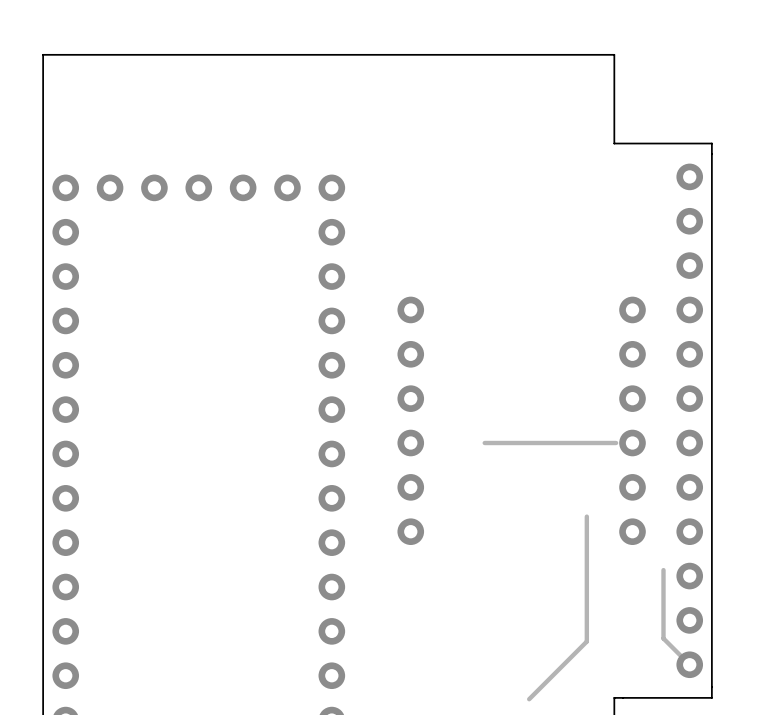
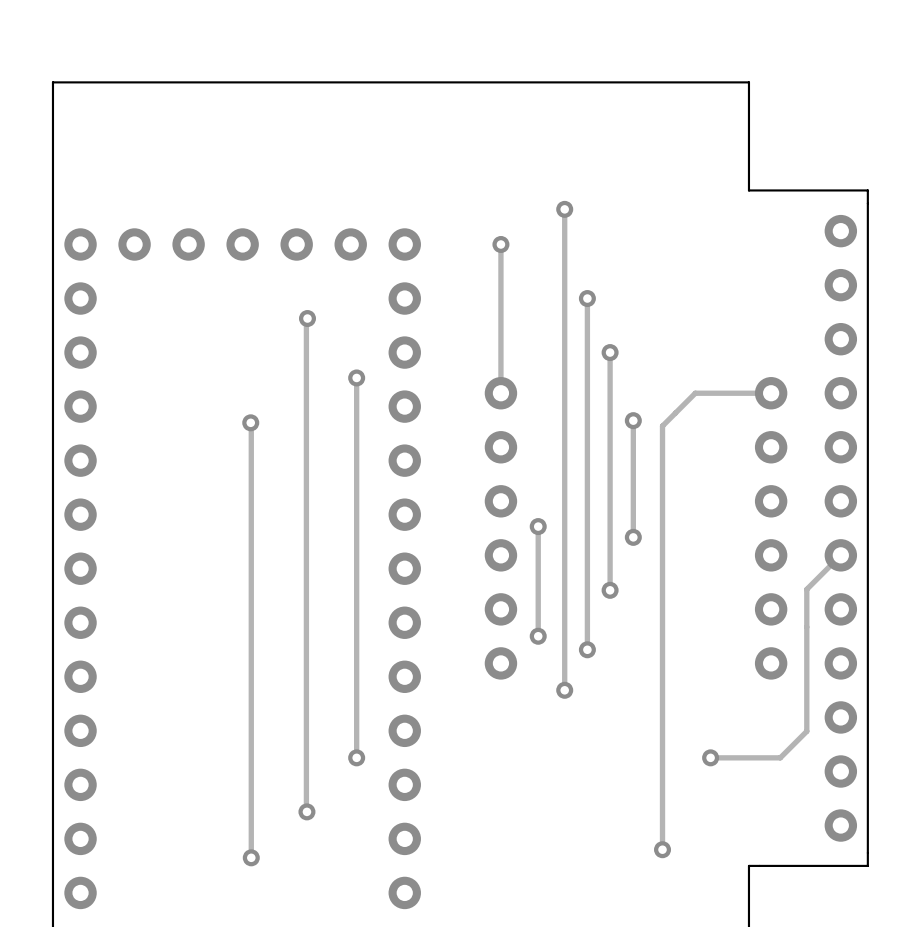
track: none -> (564, 209) (564, 690)
via: none -> (564, 209)
track: none -> (500, 244) (500, 393)
via: none -> (500, 244)
track: none -> (587, 298) (587, 649)
via: none -> (587, 298)
track: none -> (307, 318) (306, 811)
via: none -> (307, 318)
track: none -> (610, 352) (610, 590)
via: none -> (610, 352)
track: none -> (356, 377) (356, 757)
via: none -> (356, 377)
track: none -> (771, 393) (695, 393) (662, 426) (662, 849)
track: none -> (633, 420) (633, 537)
via: none -> (633, 420)
track: none -> (250, 422) (251, 857)
via: none -> (250, 422)
track: none -> (538, 526) (538, 636)
via: none -> (538, 526)
via: none -> (633, 537)
track: (616, 443) (484, 443) -> none
track: none -> (840, 555) (806, 589) (806, 731) (780, 757) (710, 757)
via: none -> (610, 590)
via: none -> (538, 636)
track: (586, 516) (586, 641) (529, 699) -> none
via: none -> (587, 649)
via: none -> (564, 690)
track: (663, 570) (663, 638) (689, 664) -> none
via: none -> (356, 757)
via: none -> (710, 757)
via: none -> (306, 811)
via: none -> (662, 849)
via: none -> (251, 857)

